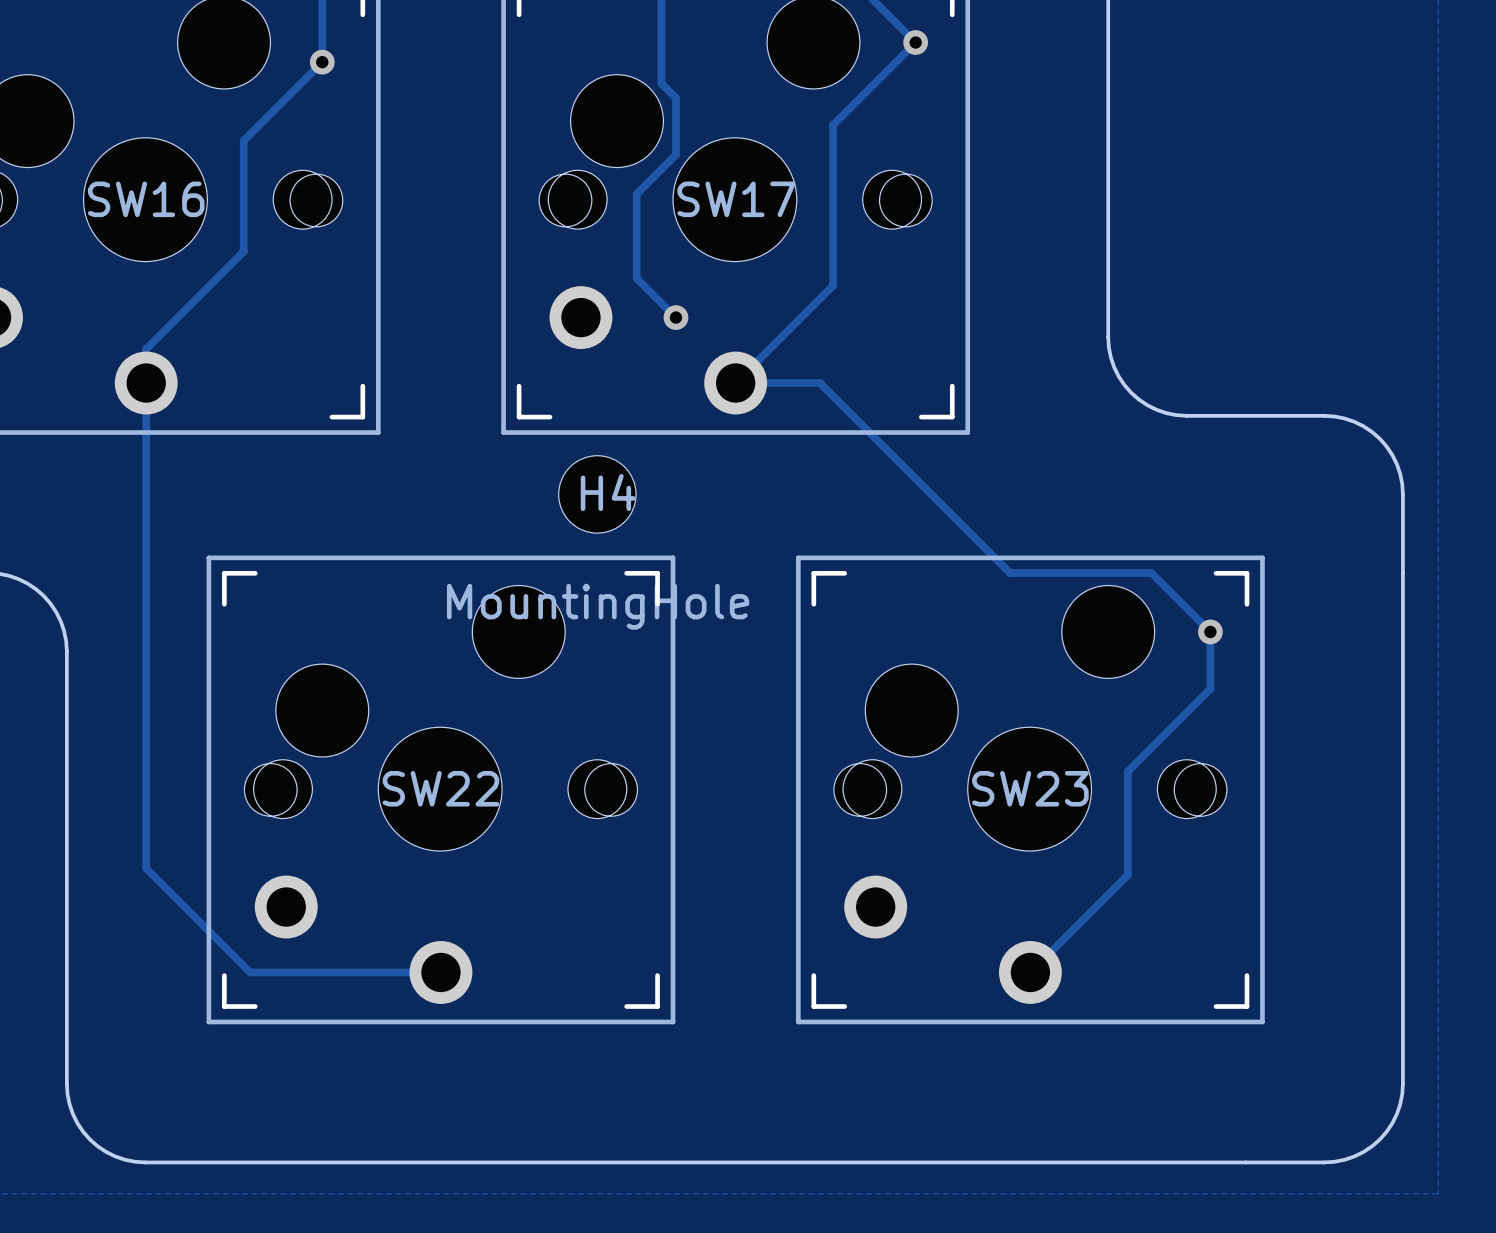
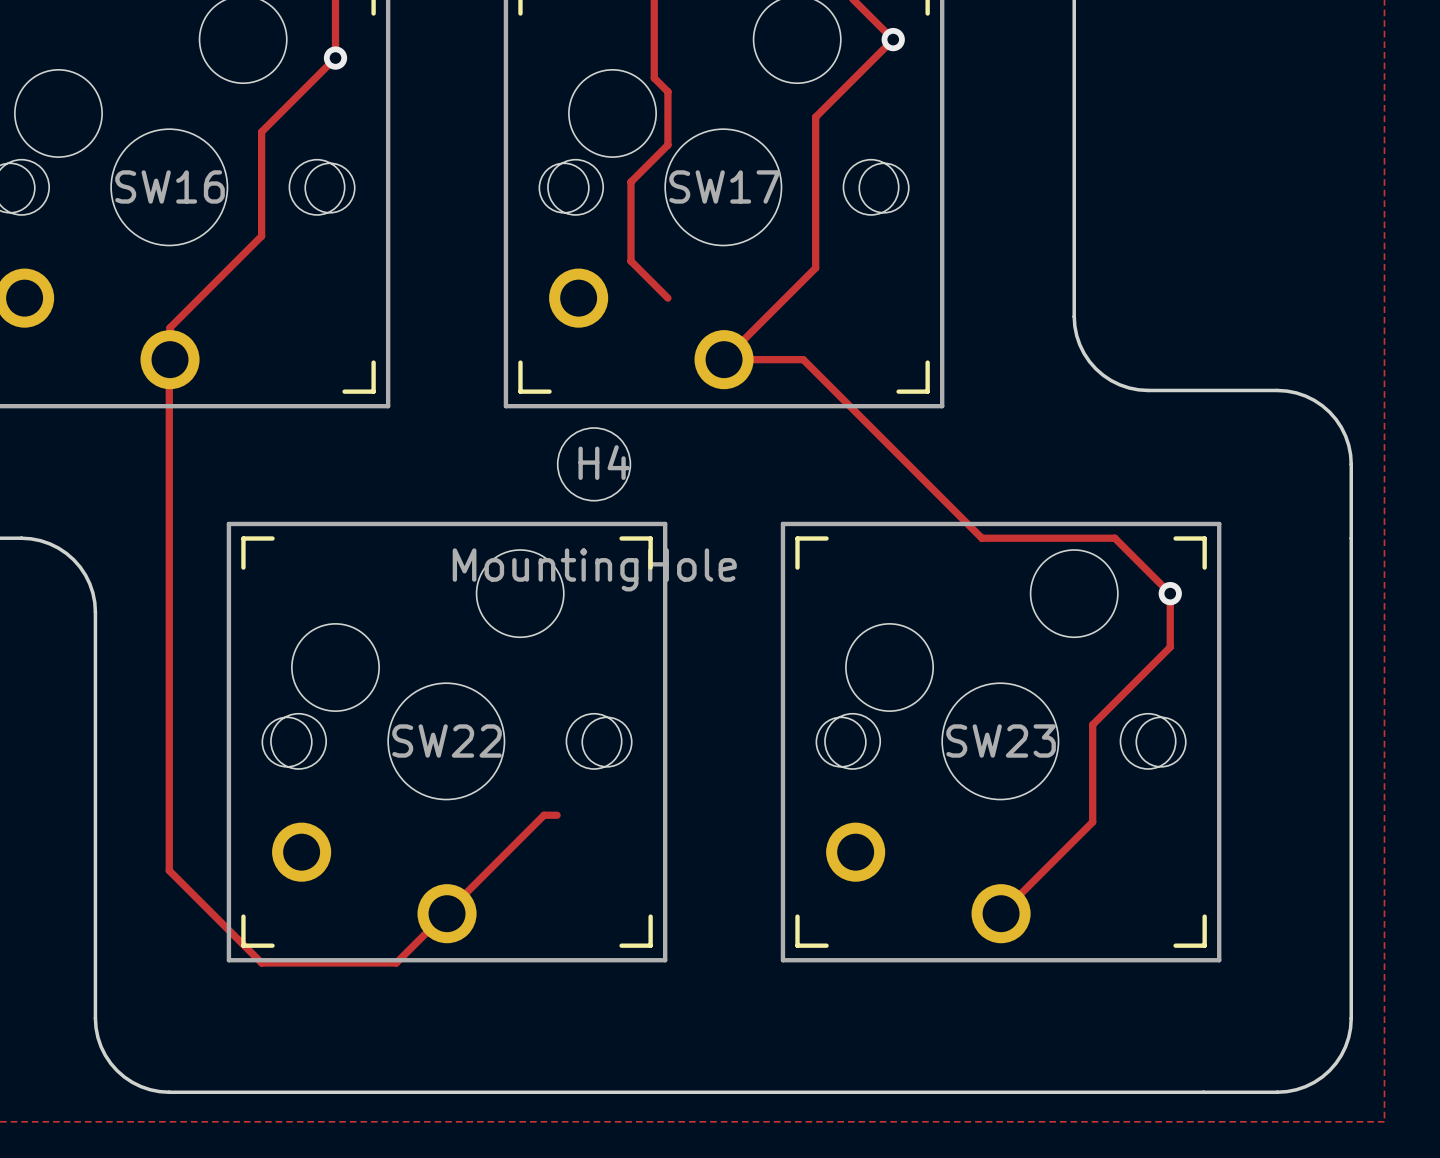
via: (675, 317) -> none
track: (146, 383) (146, 868) (250, 972) (440, 972) -> (169, 358) (169, 870) (261, 962) (396, 962) (544, 815) (557, 815)

